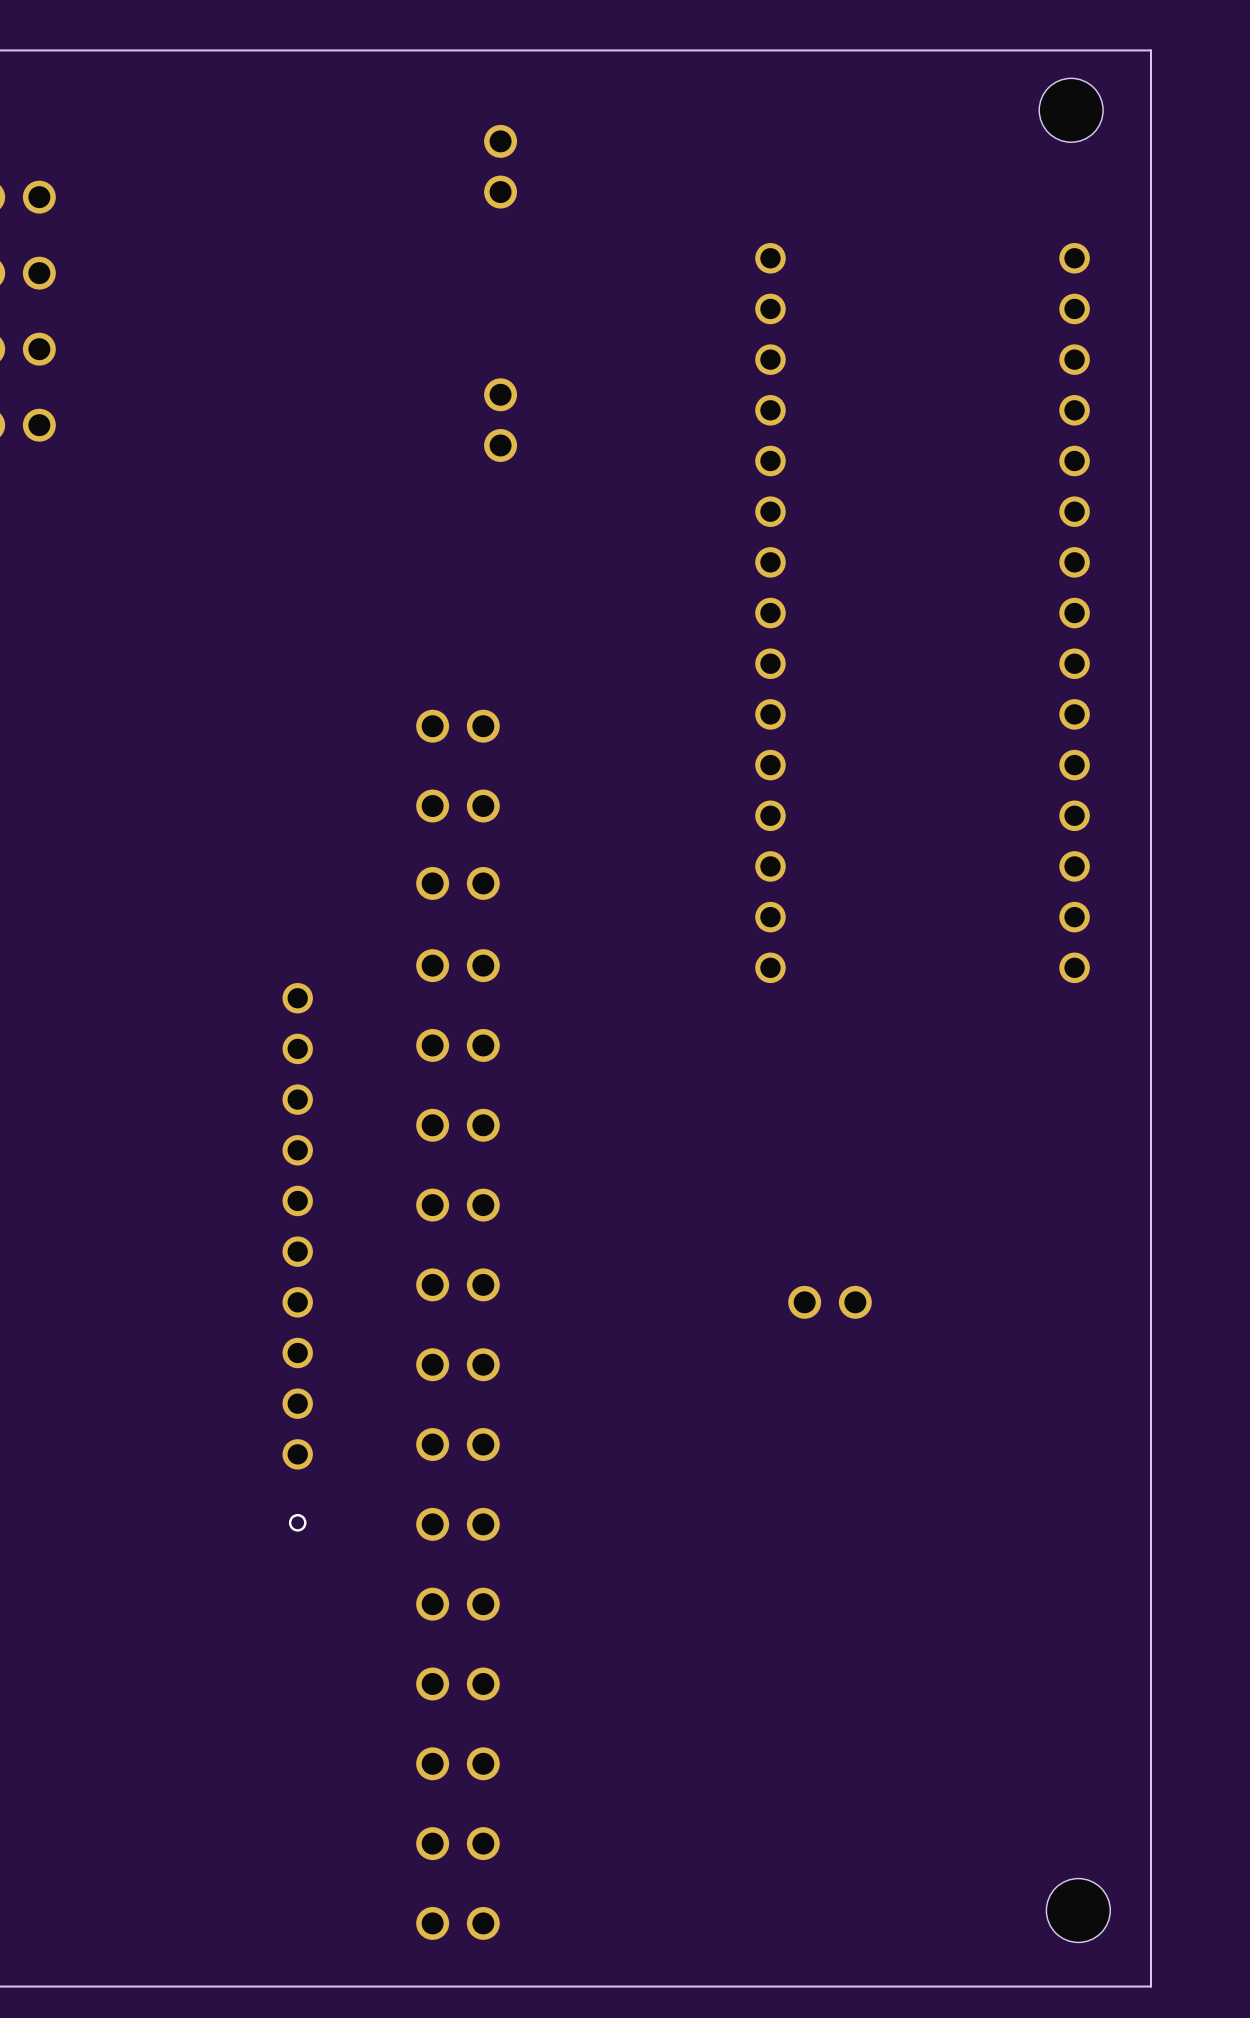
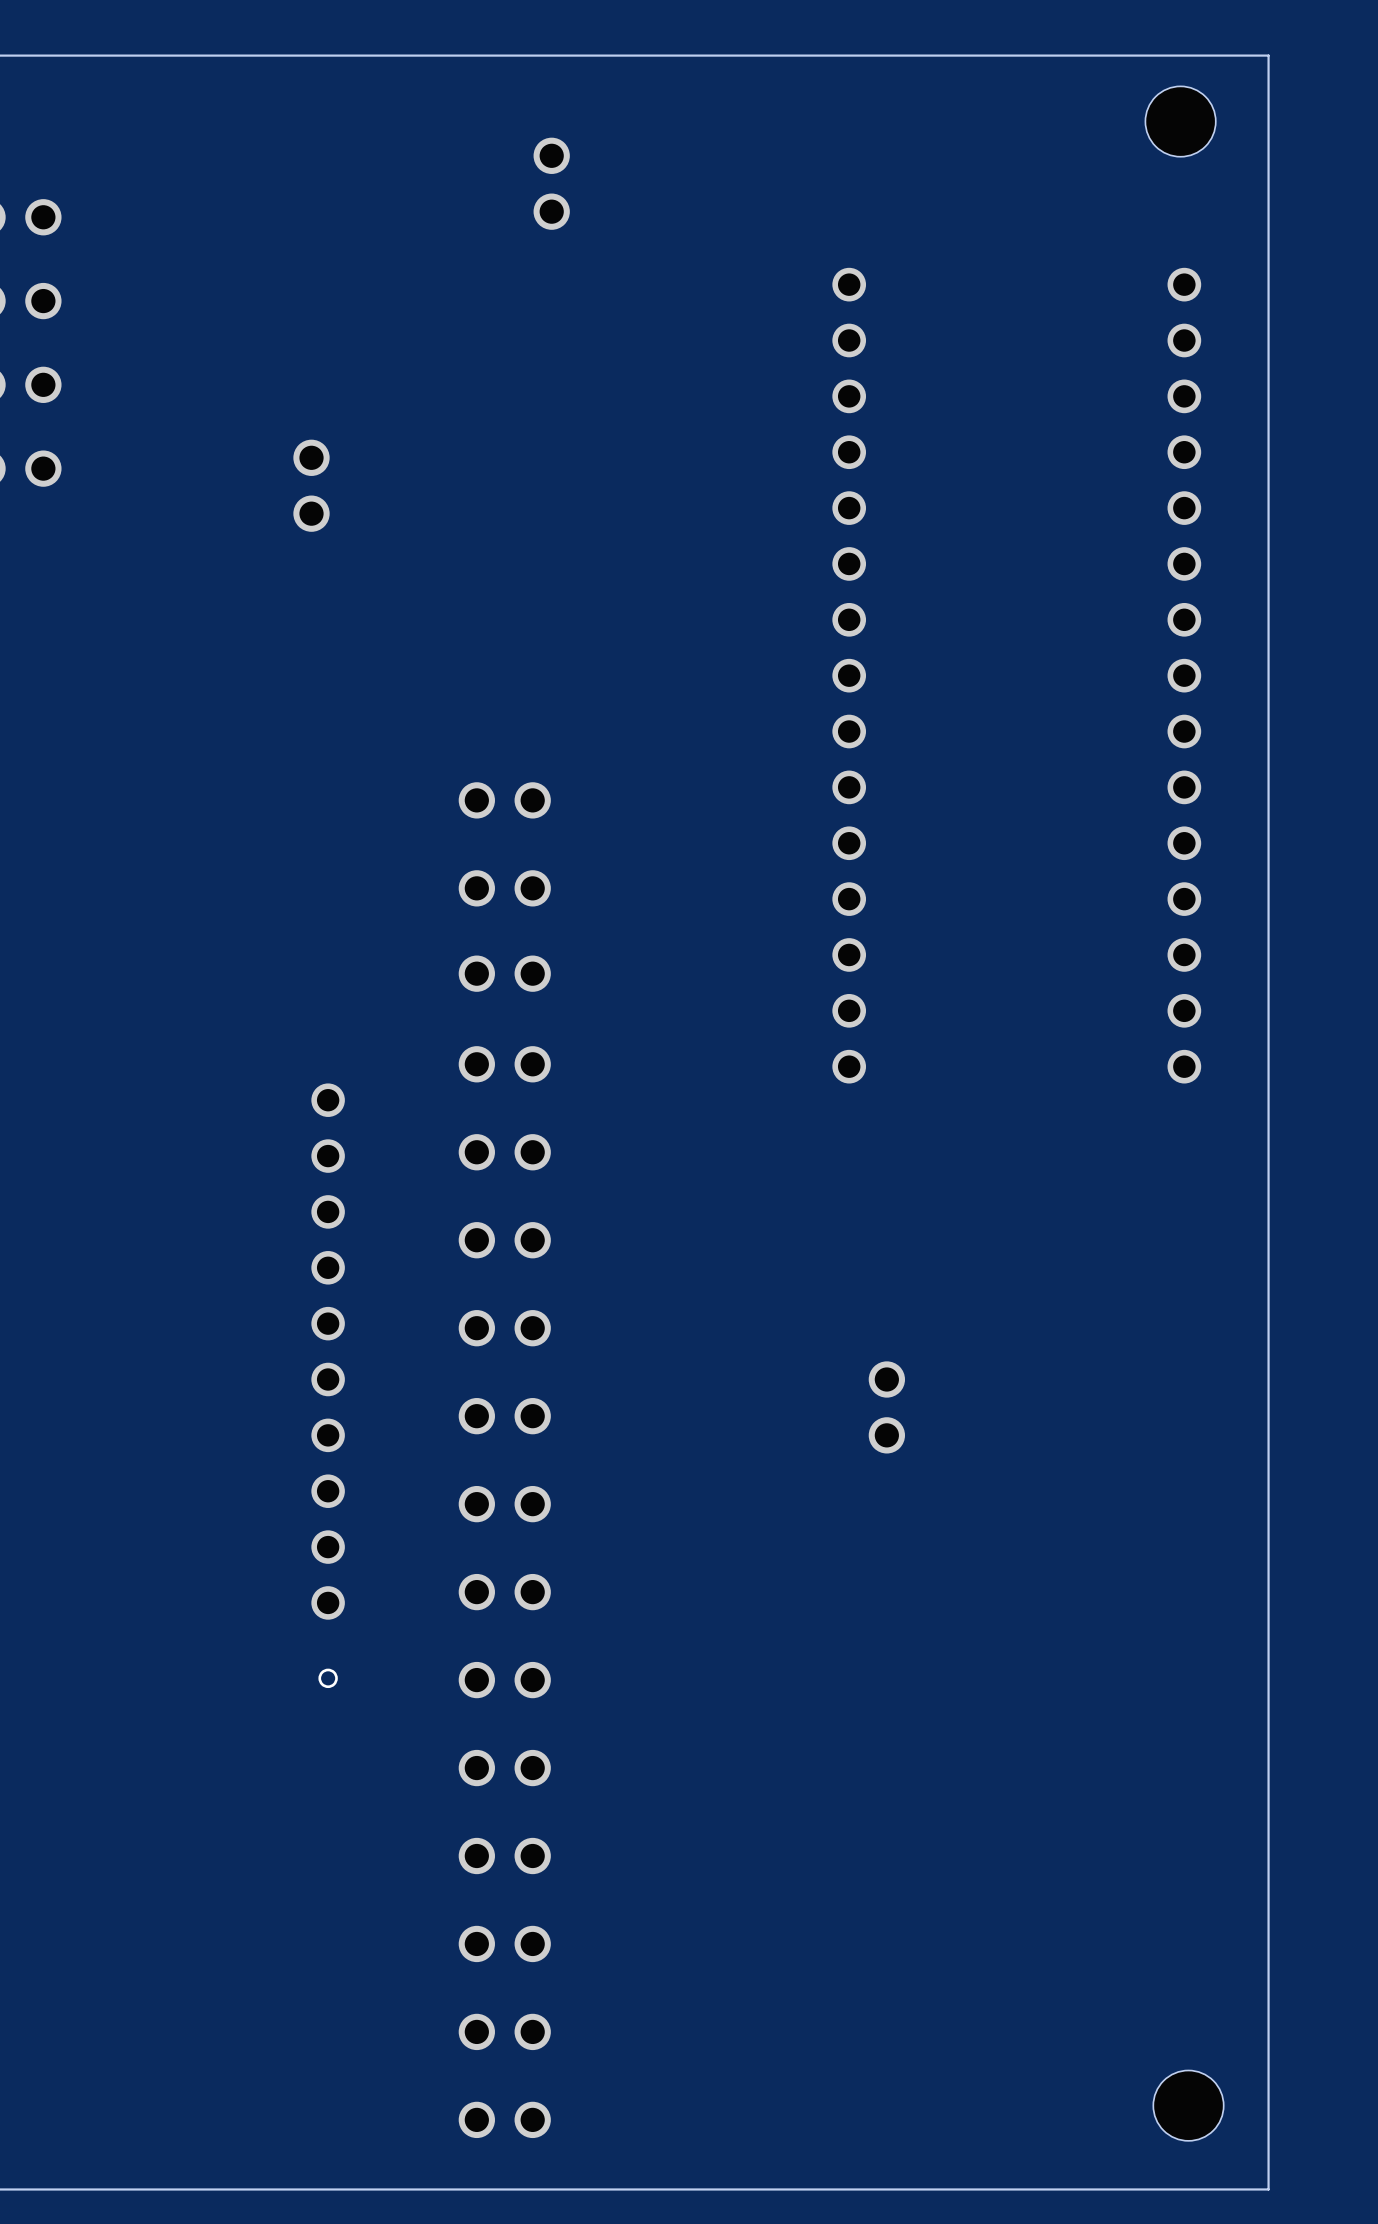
part position: (500, 420) -> (311, 485)
part rotation: 0° (830, 1302) -> 90° clockwise (886, 1407)

